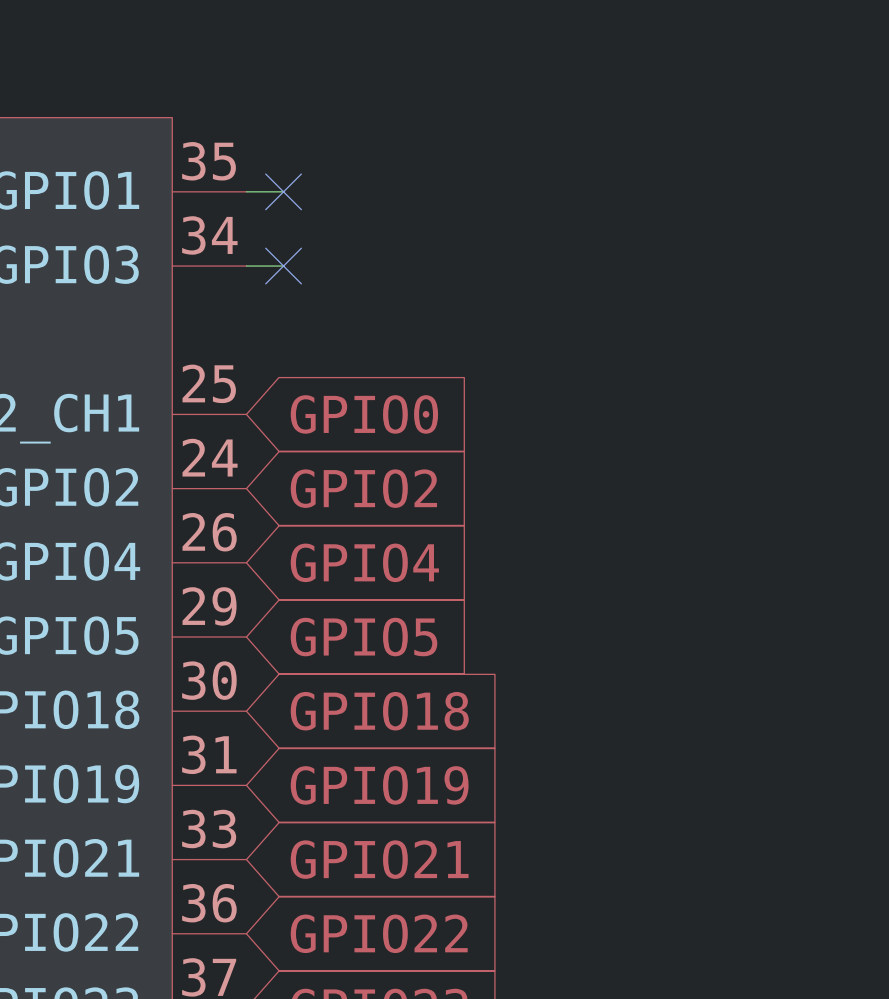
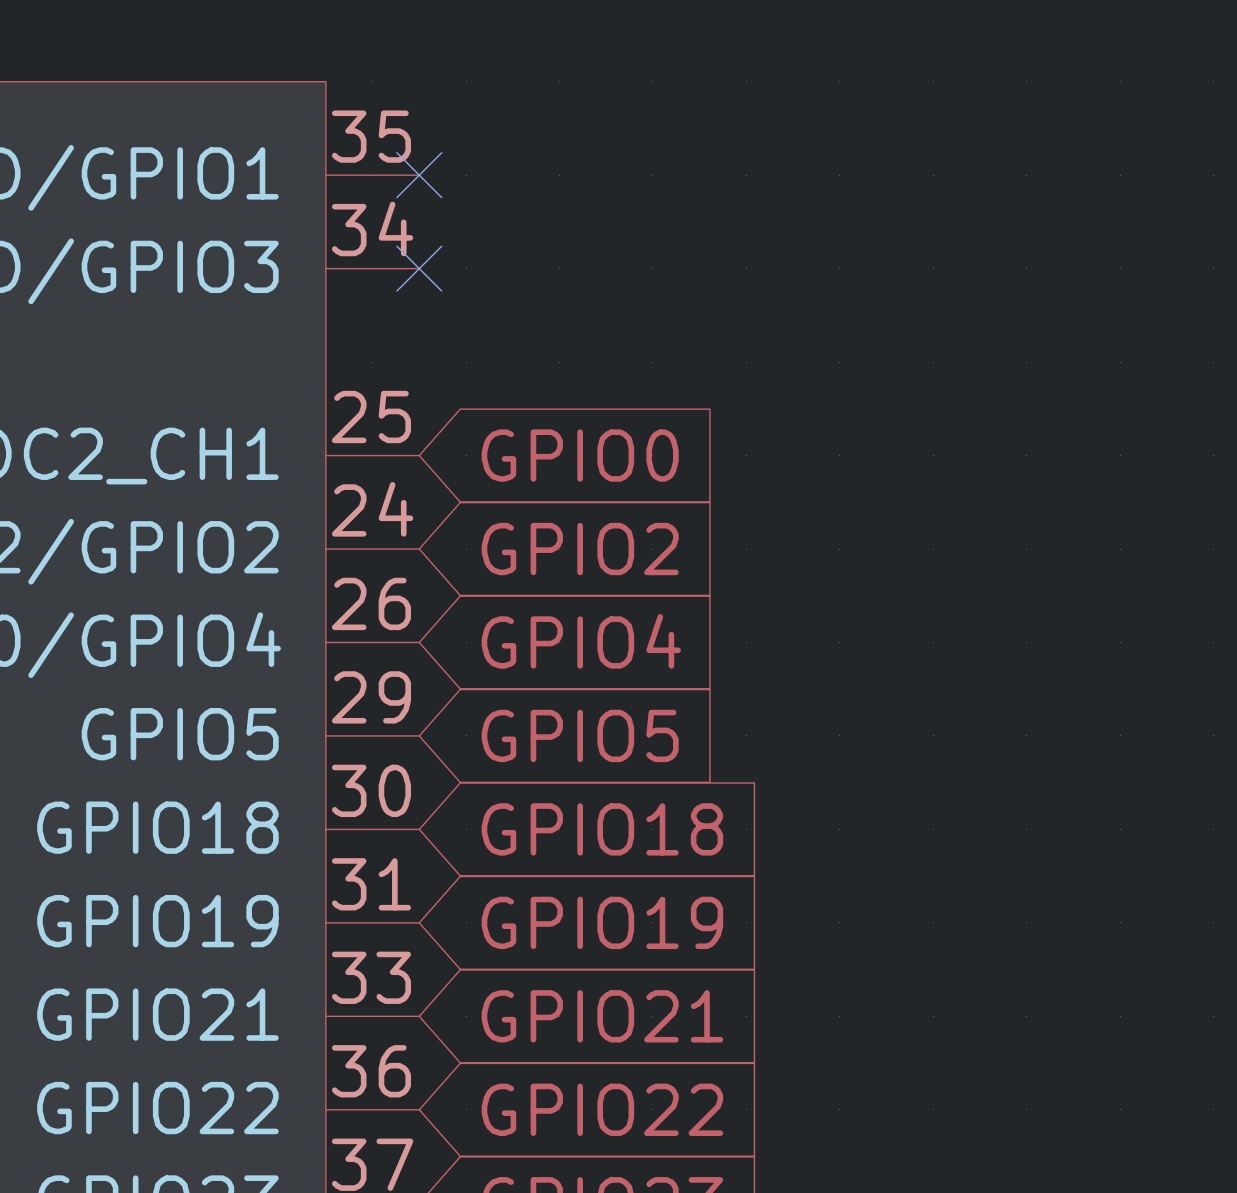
wire: (246, 191) (283, 191) -> none
no-connect mark position: (283, 191) -> (419, 175)
wire: (246, 266) (283, 266) -> none
no-connect mark position: (283, 266) -> (419, 268)

